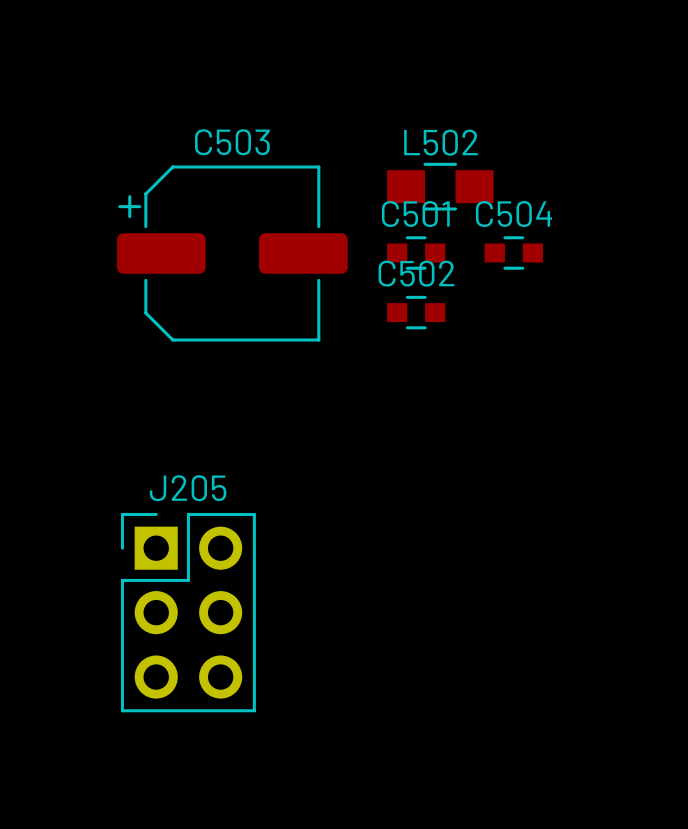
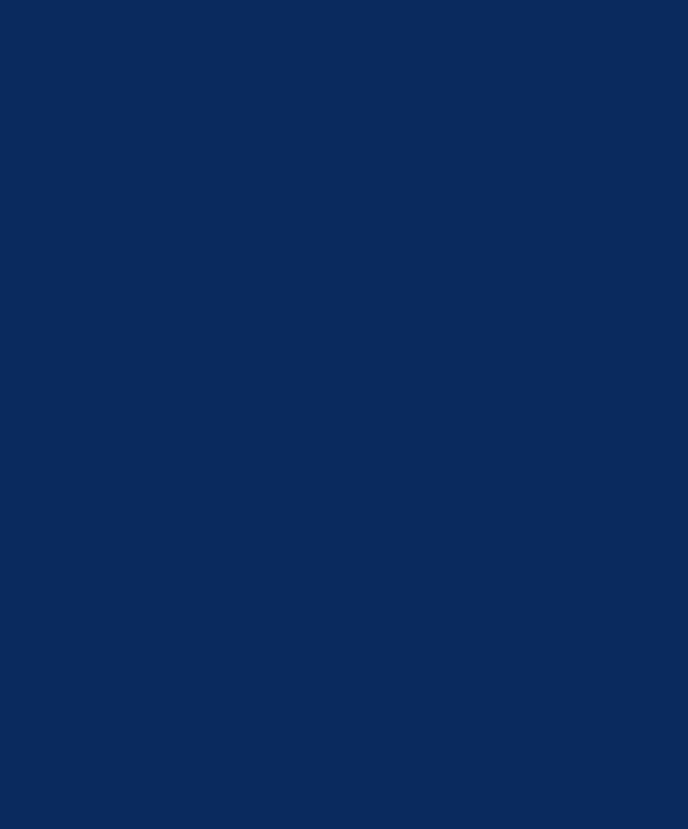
L502: (440, 186) -> none
C501: (416, 252) -> none
C504: (513, 252) -> none
C503: (232, 253) -> none
C502: (416, 312) -> none
J205: (188, 612) -> none

